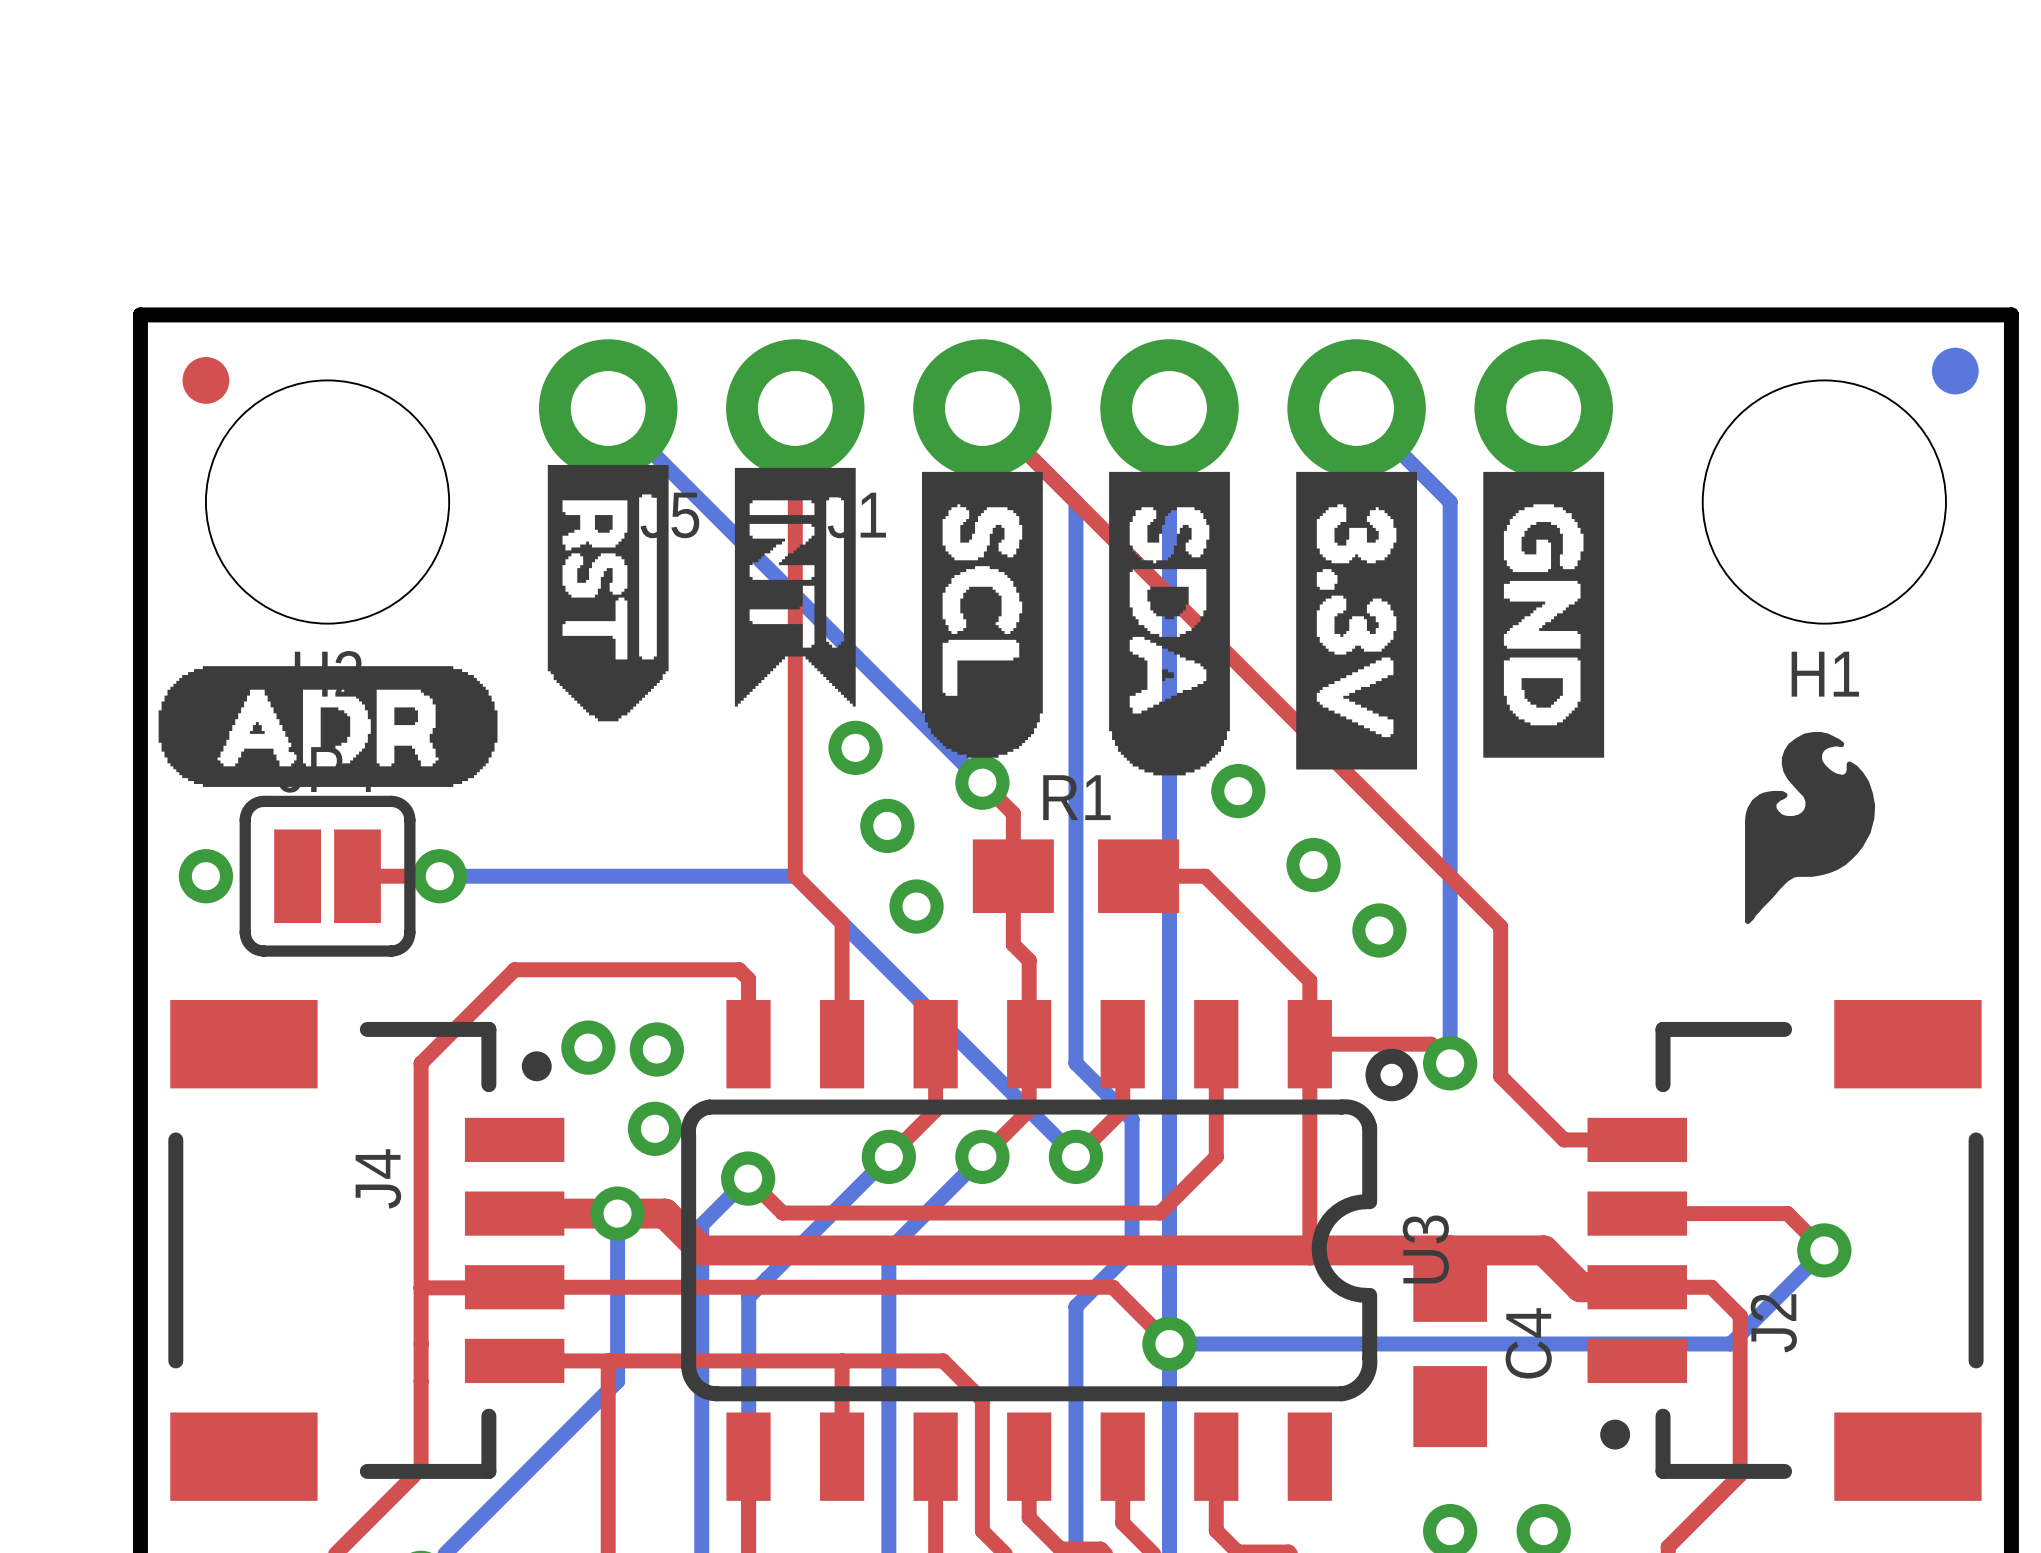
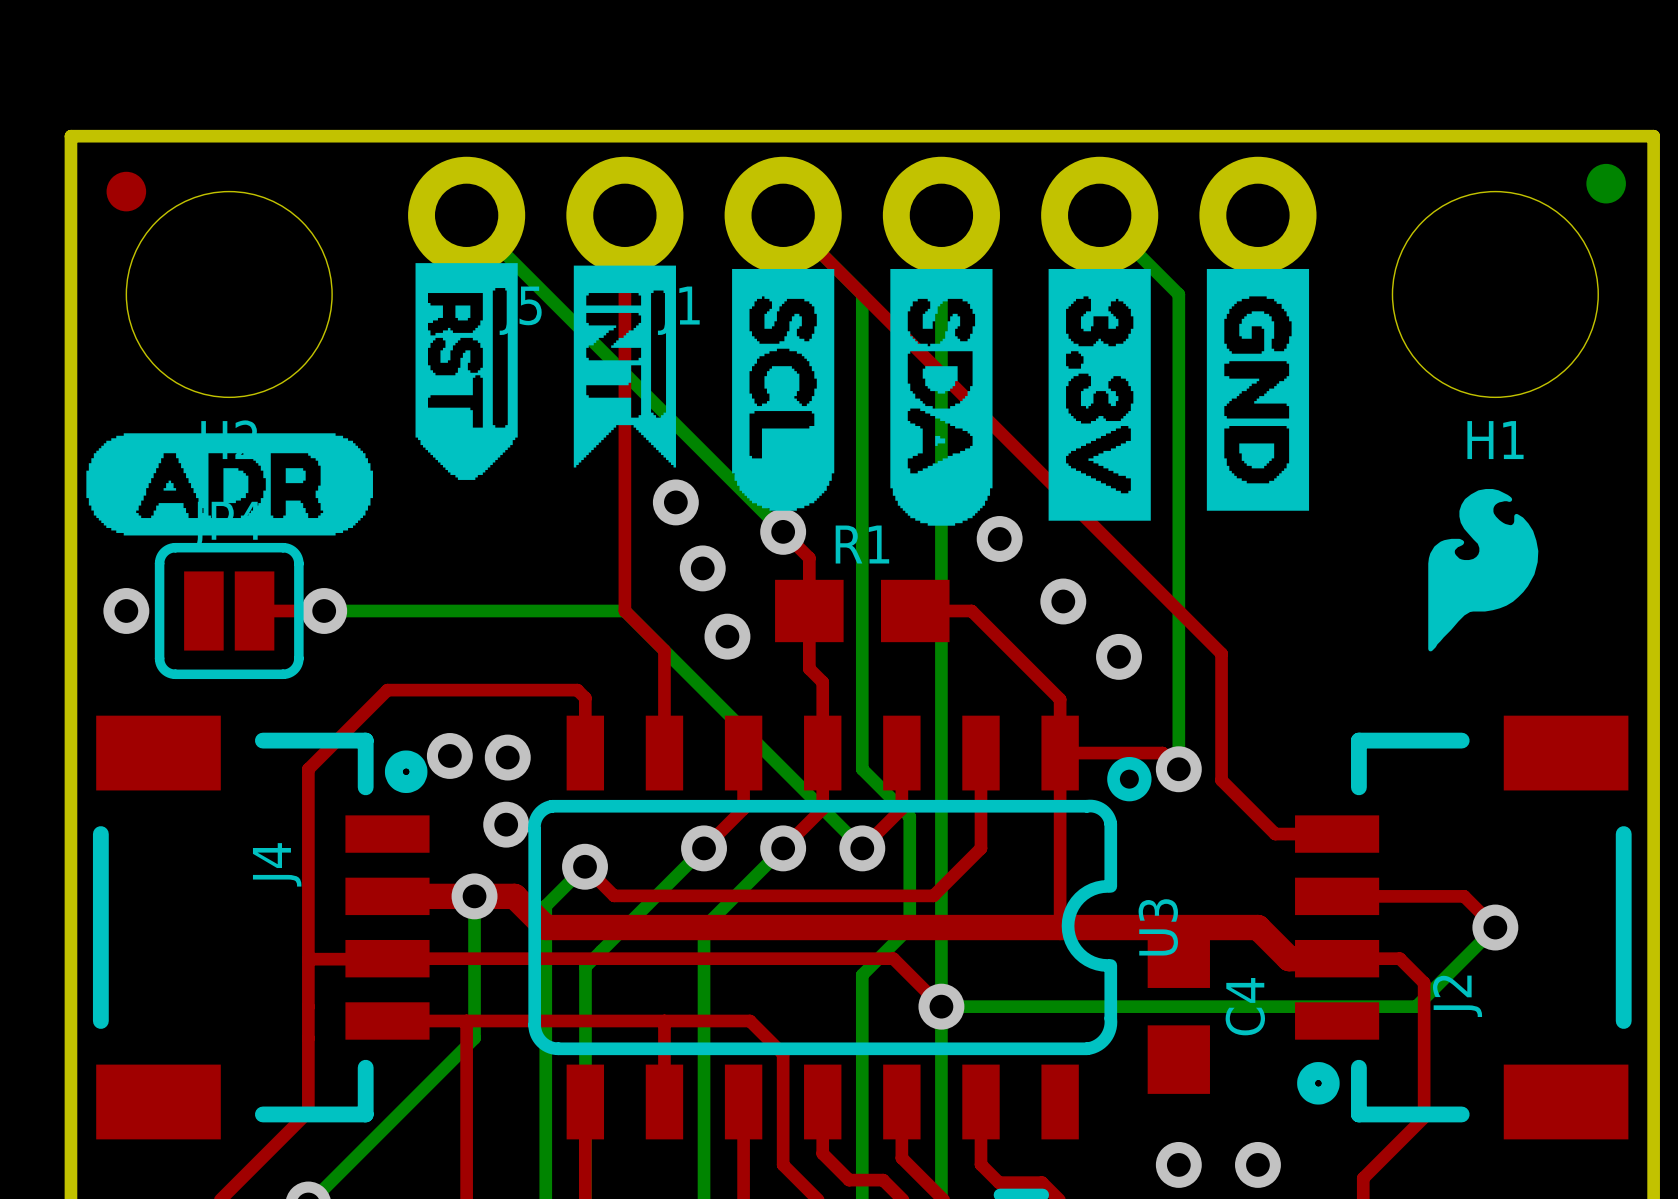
J4 footprint: [168, 999, 565, 1501] -> [92, 715, 430, 1140]
J2 footprint: [1587, 999, 1984, 1501] -> [1295, 715, 1632, 1140]

